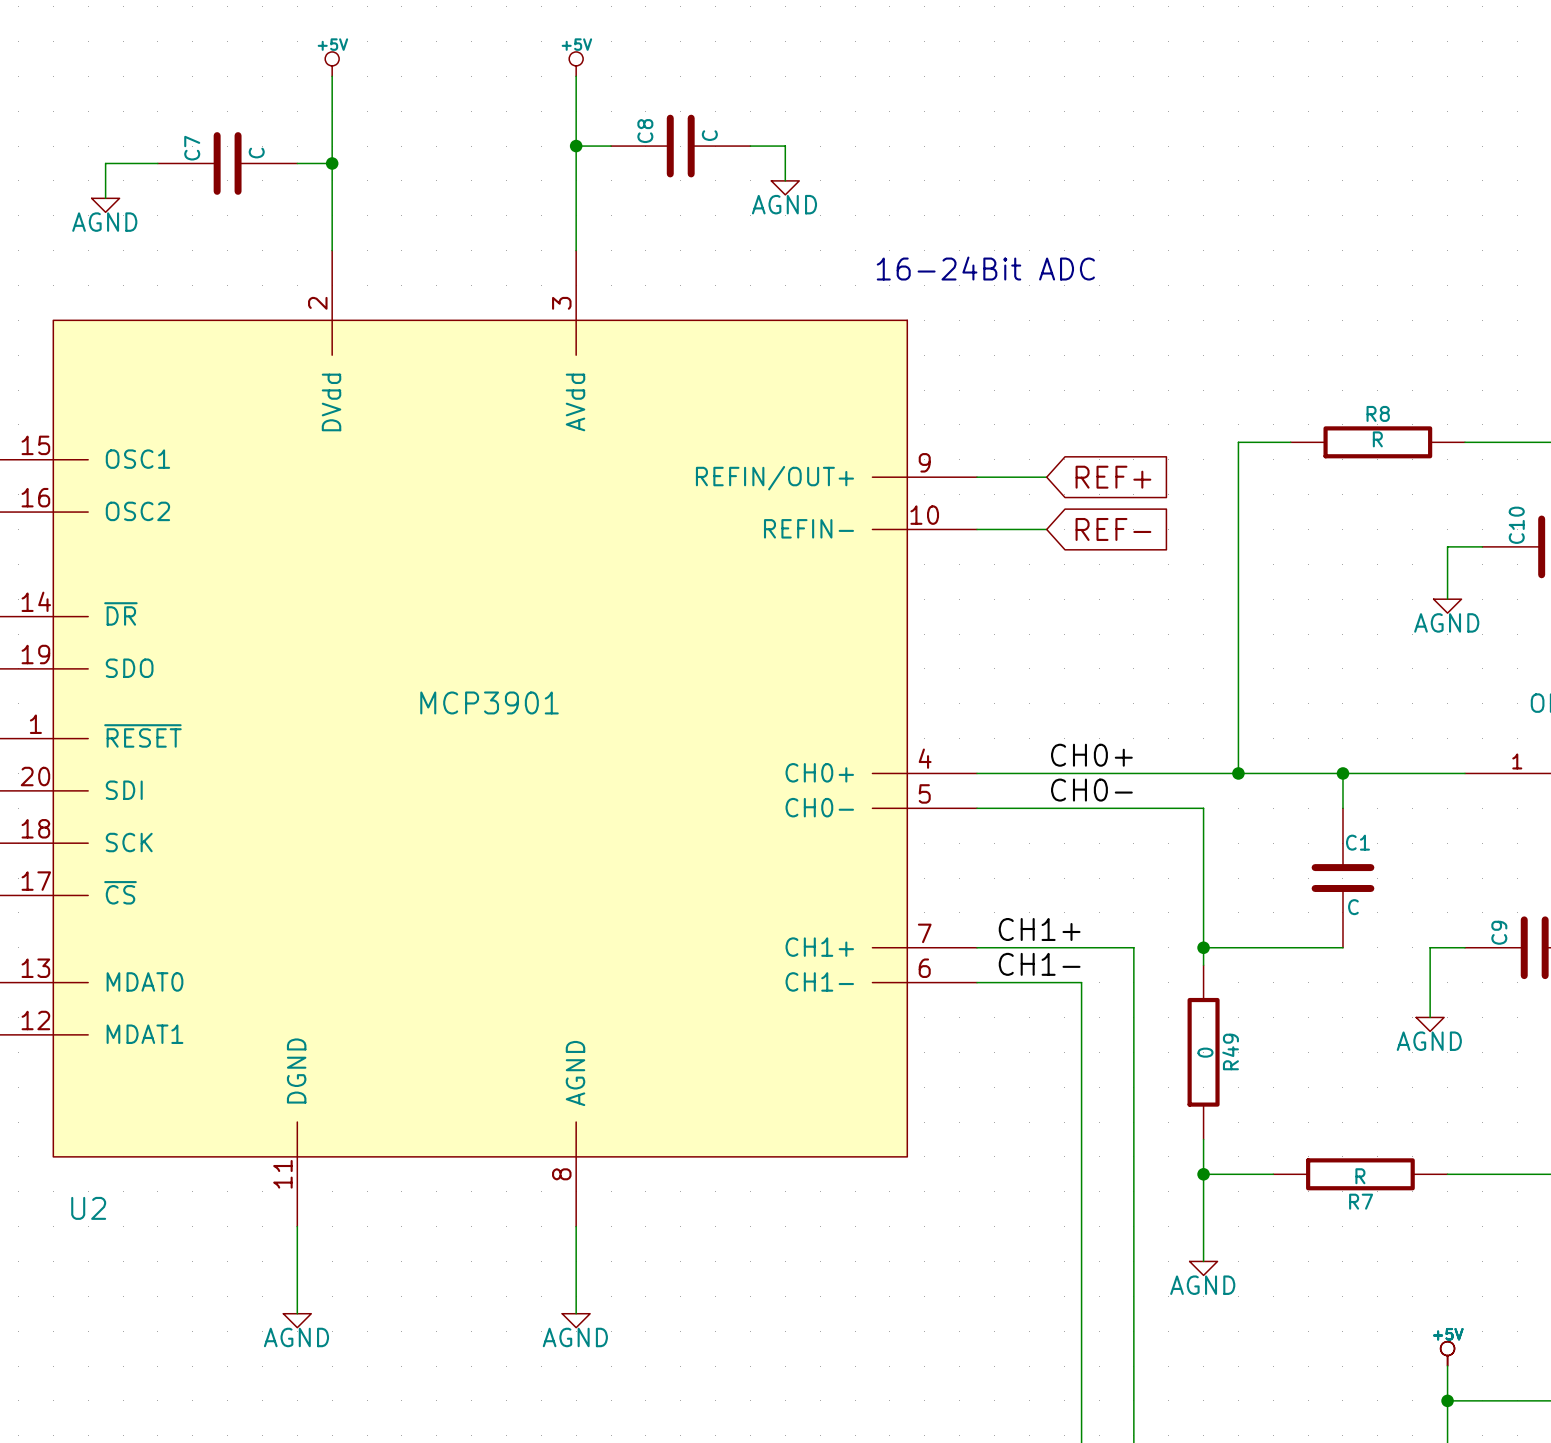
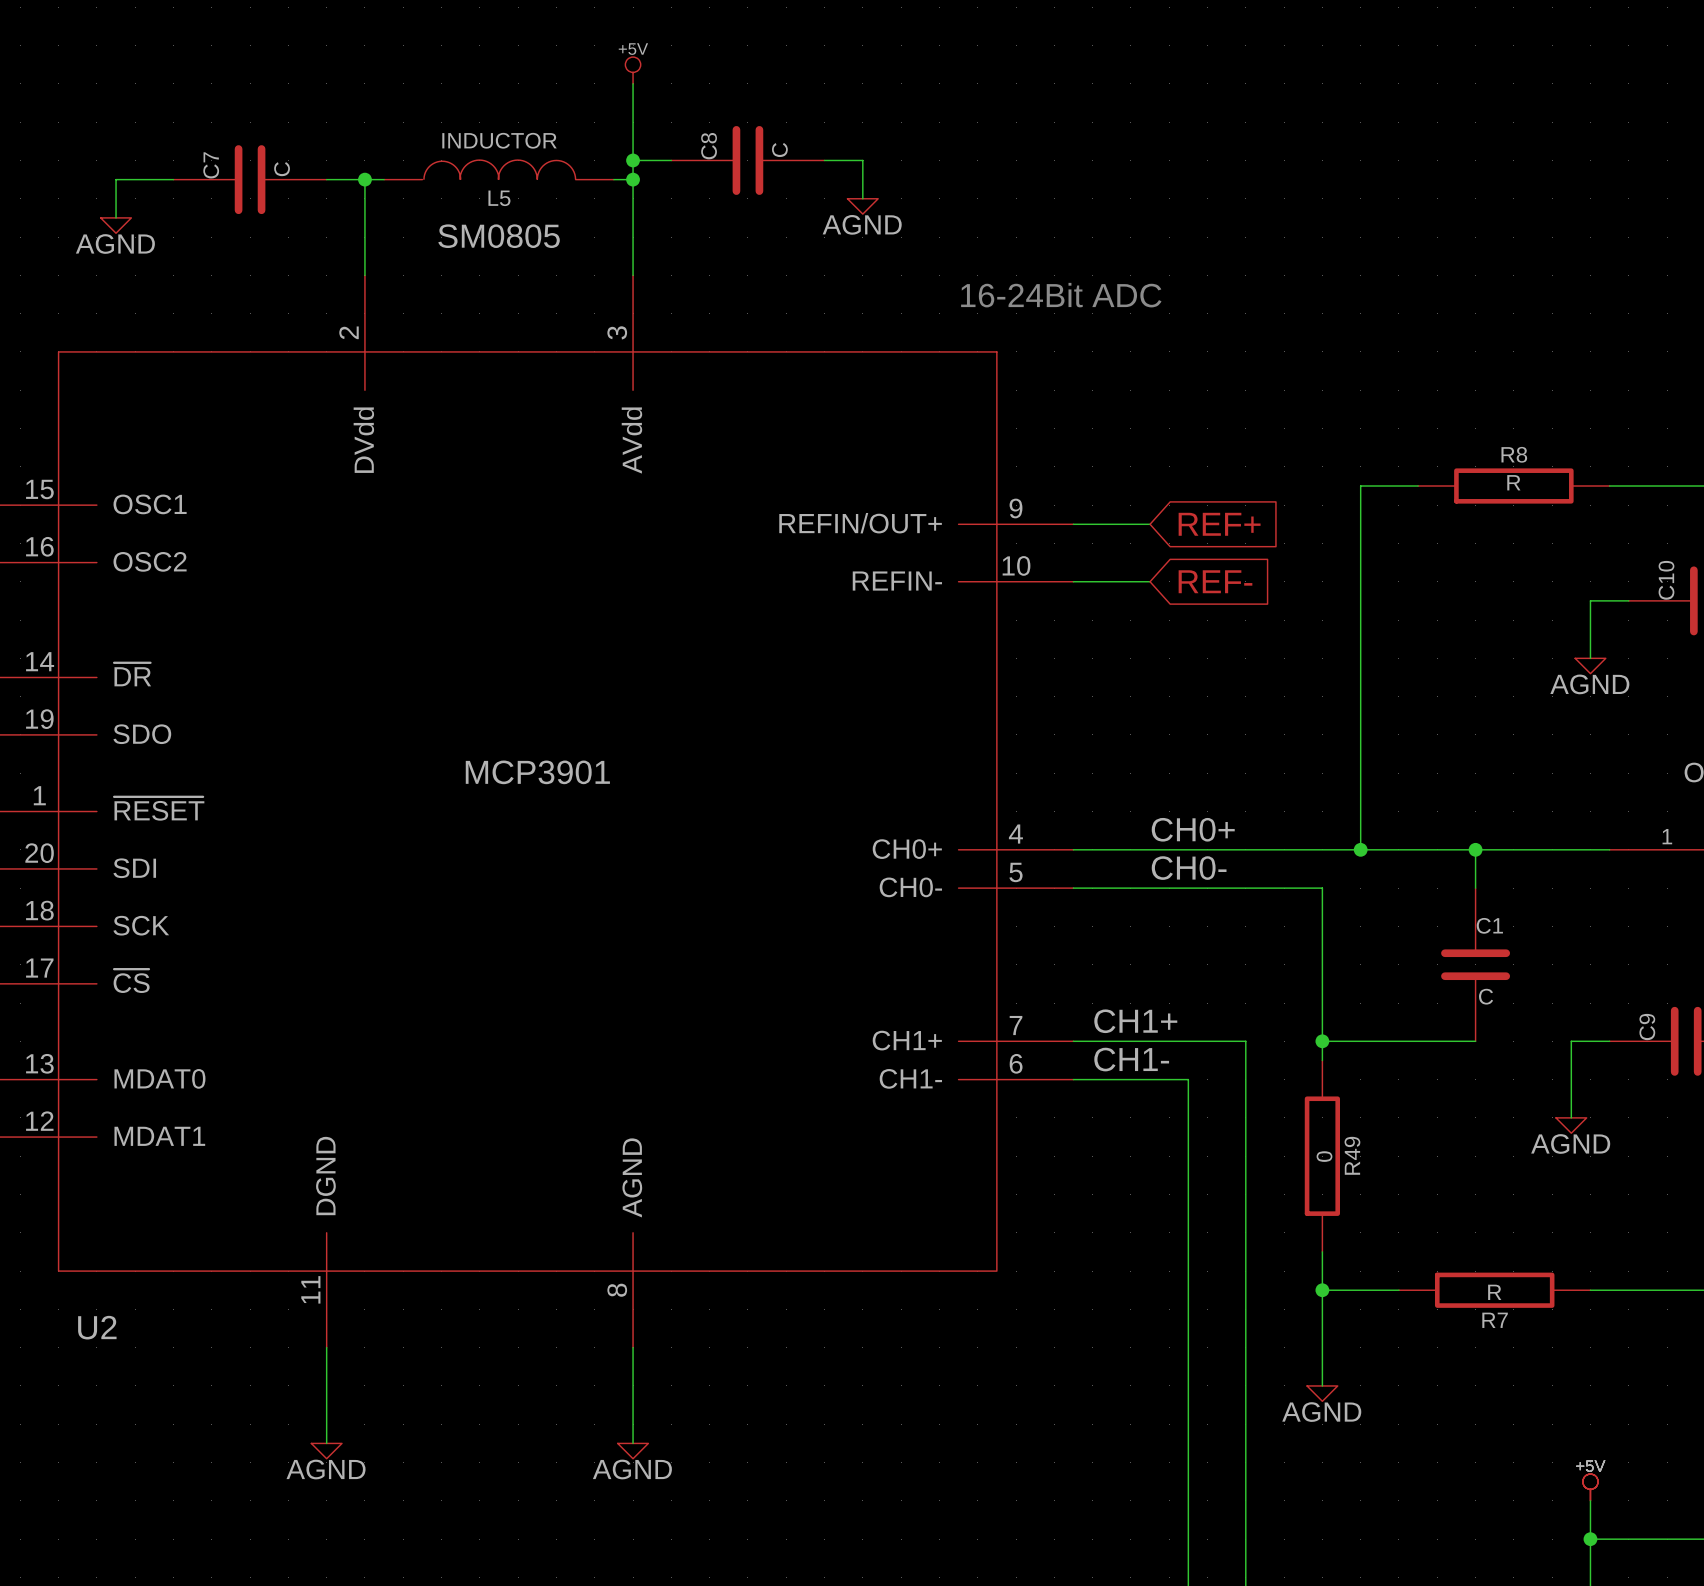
power symbol: +5V (332, 64) -> none
wire: (332, 76) (332, 163) -> (384, 179) (364, 179)
L5: none -> INDUCTOR (499, 169)
wire: none -> (613, 179) (633, 179)
junction: none -> (633, 179)

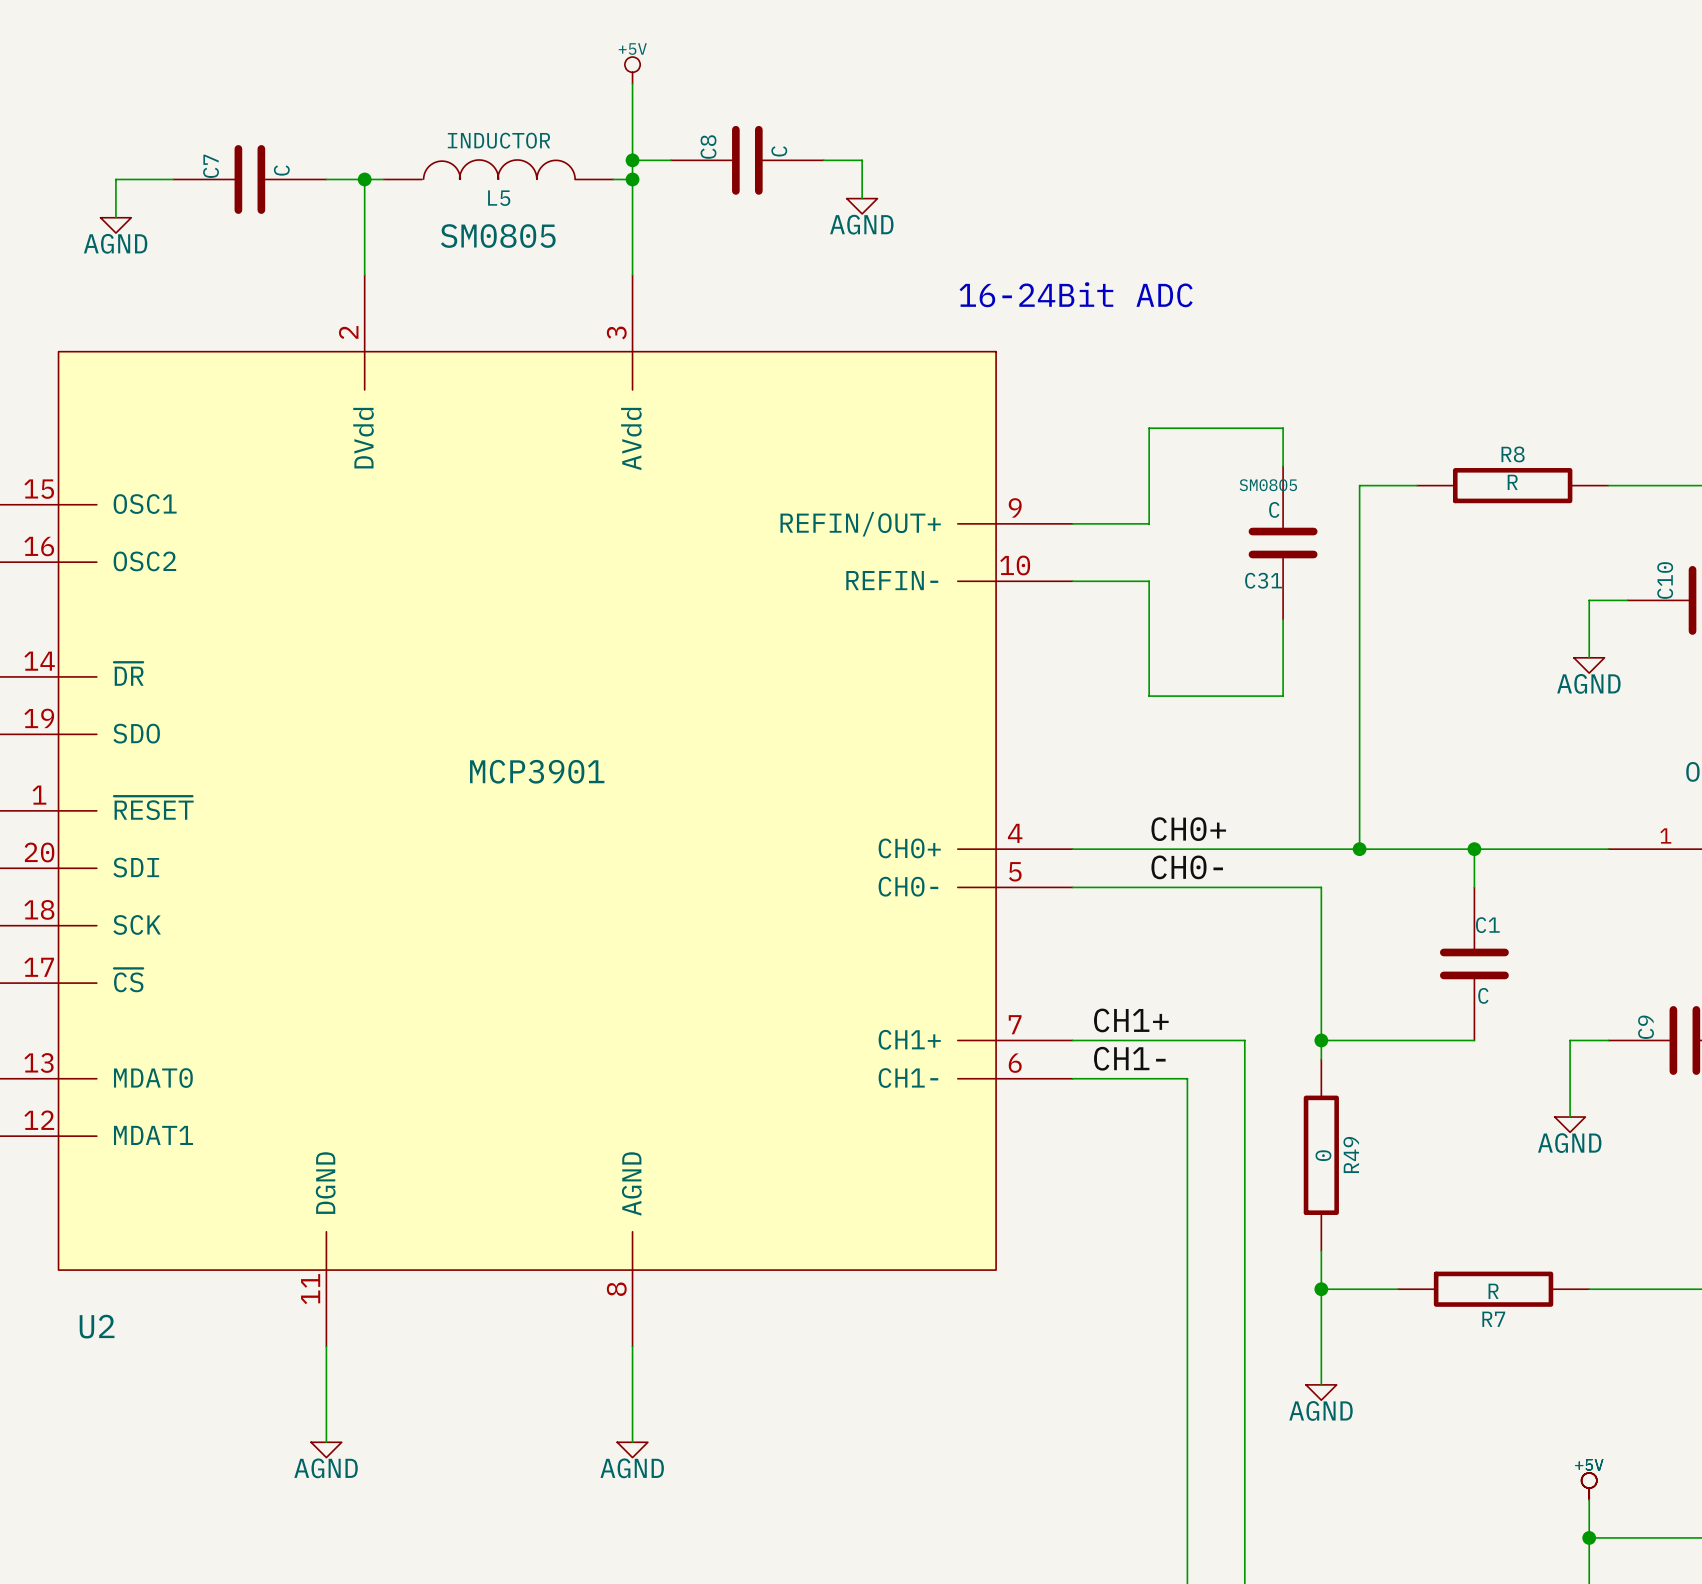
wire: none -> (1283, 466) (1283, 428) (1149, 428) (1149, 523)
global label: REF+ (1219, 524) -> none
C31: none -> C (1283, 543)
wire: none -> (1149, 581) (1149, 696) (1283, 696) (1283, 619)
global label: REF- (1215, 581) -> none

